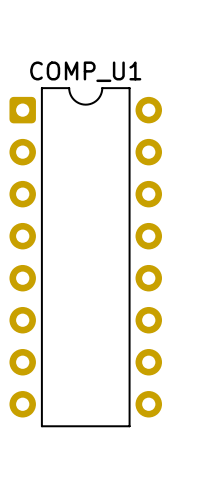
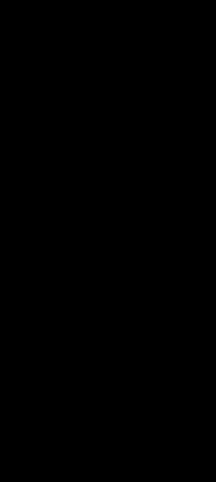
COMP_U1: (85, 257) -> none

